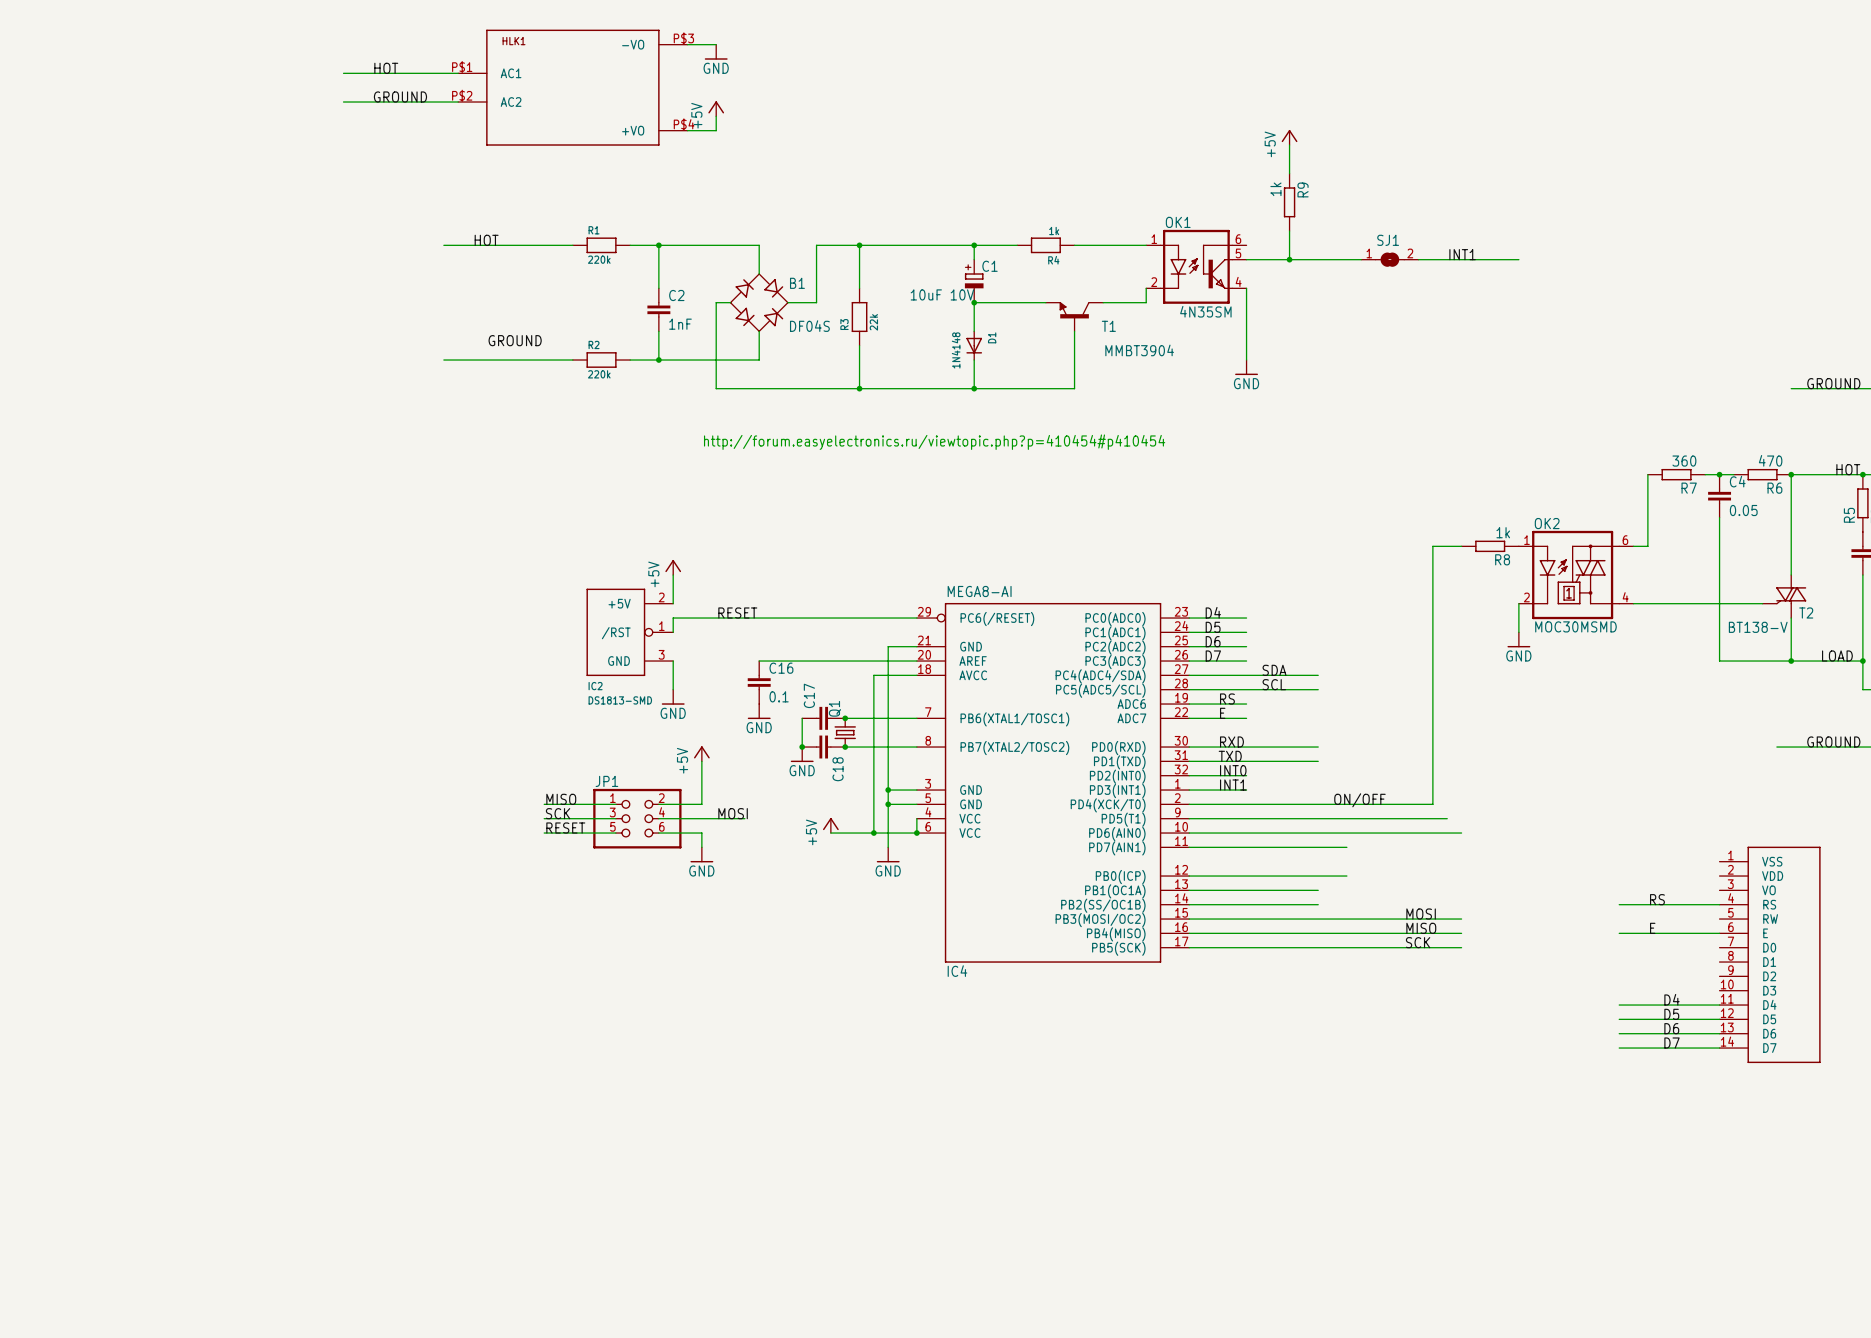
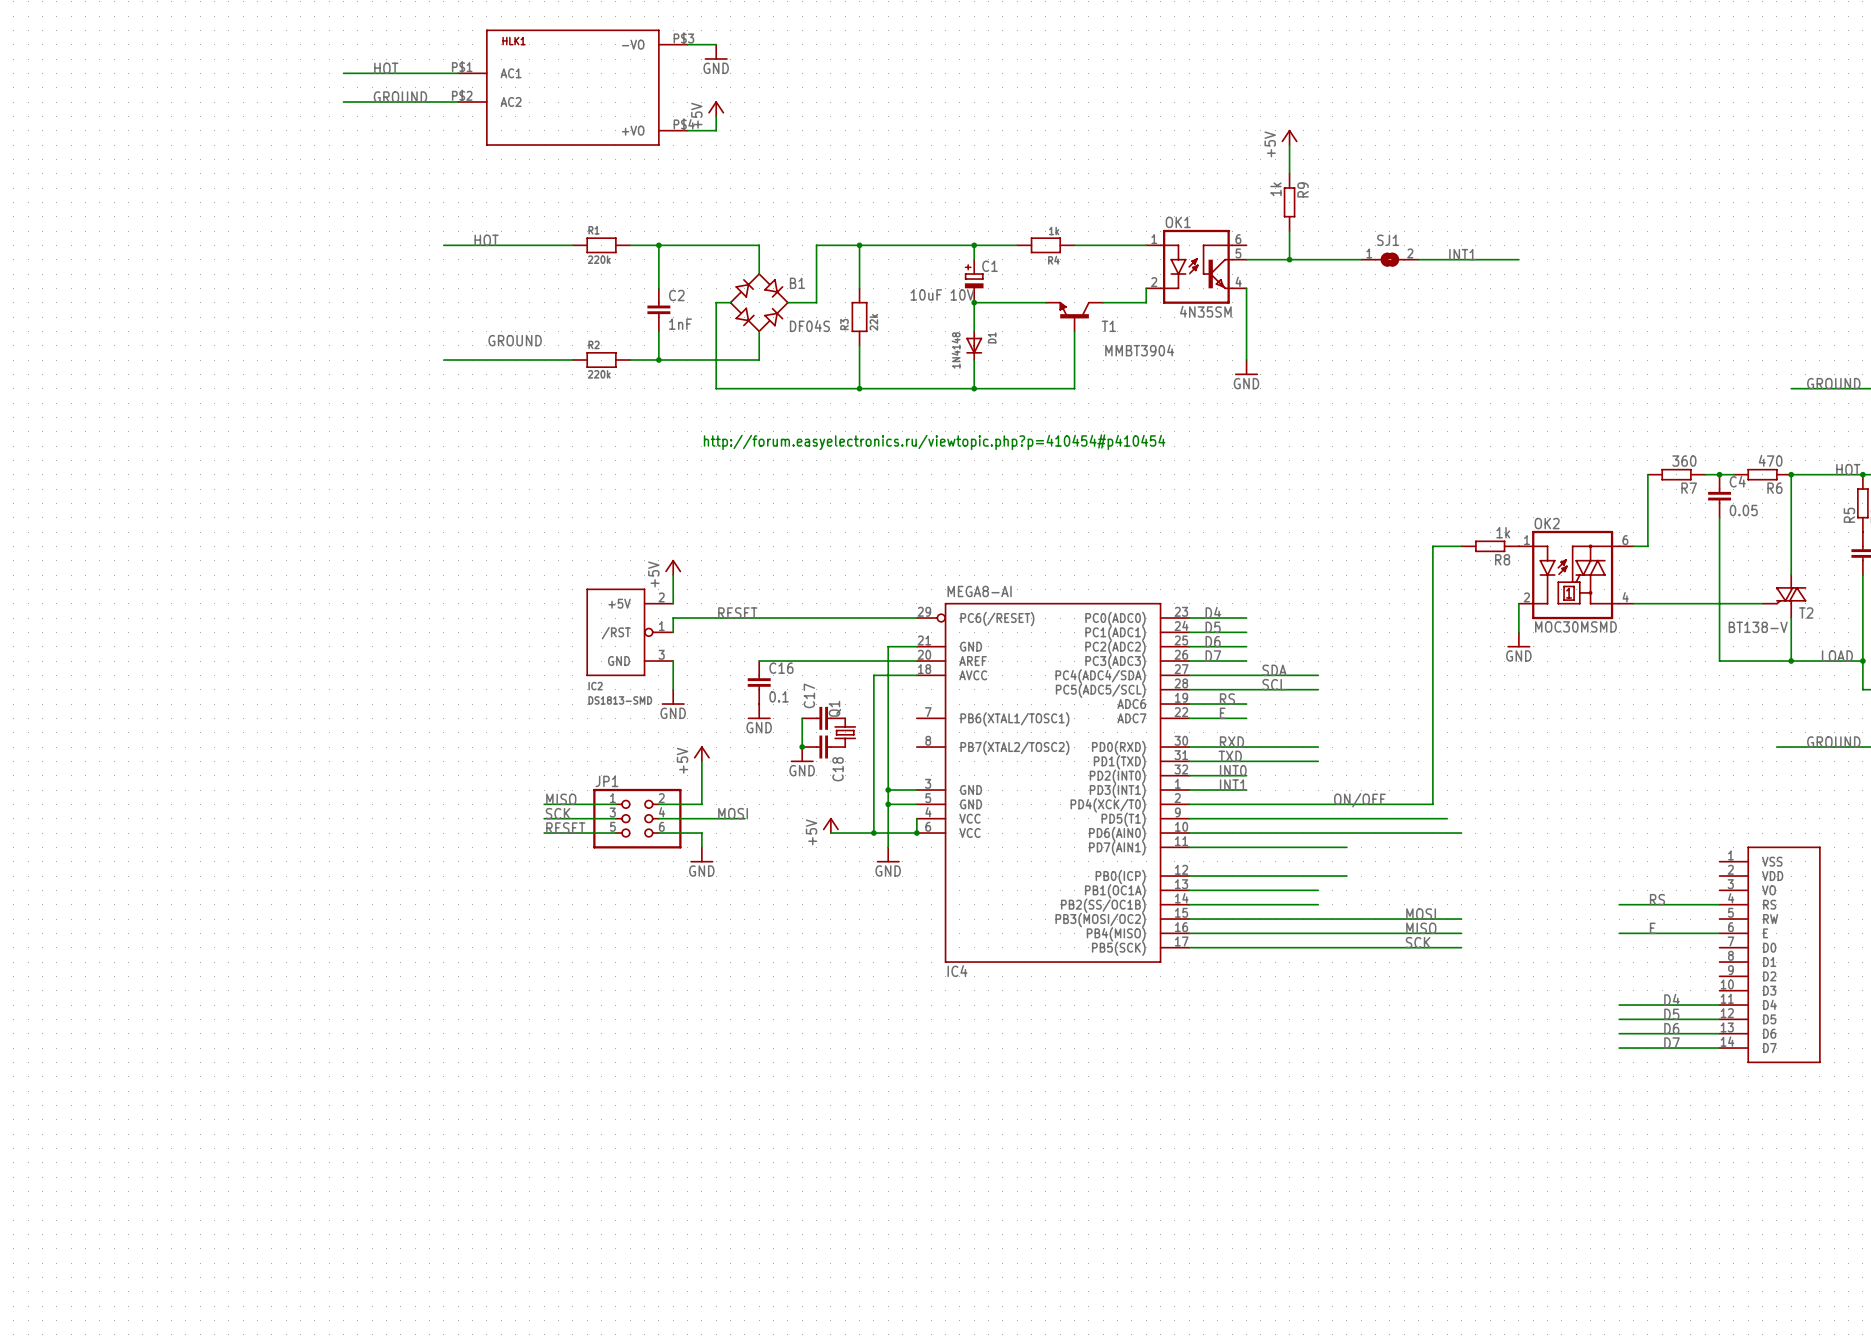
wire: (845, 718) (916, 718) -> none
junction: (845, 718) -> none
wire: (845, 747) (916, 747) -> none
junction: (845, 747) -> none

